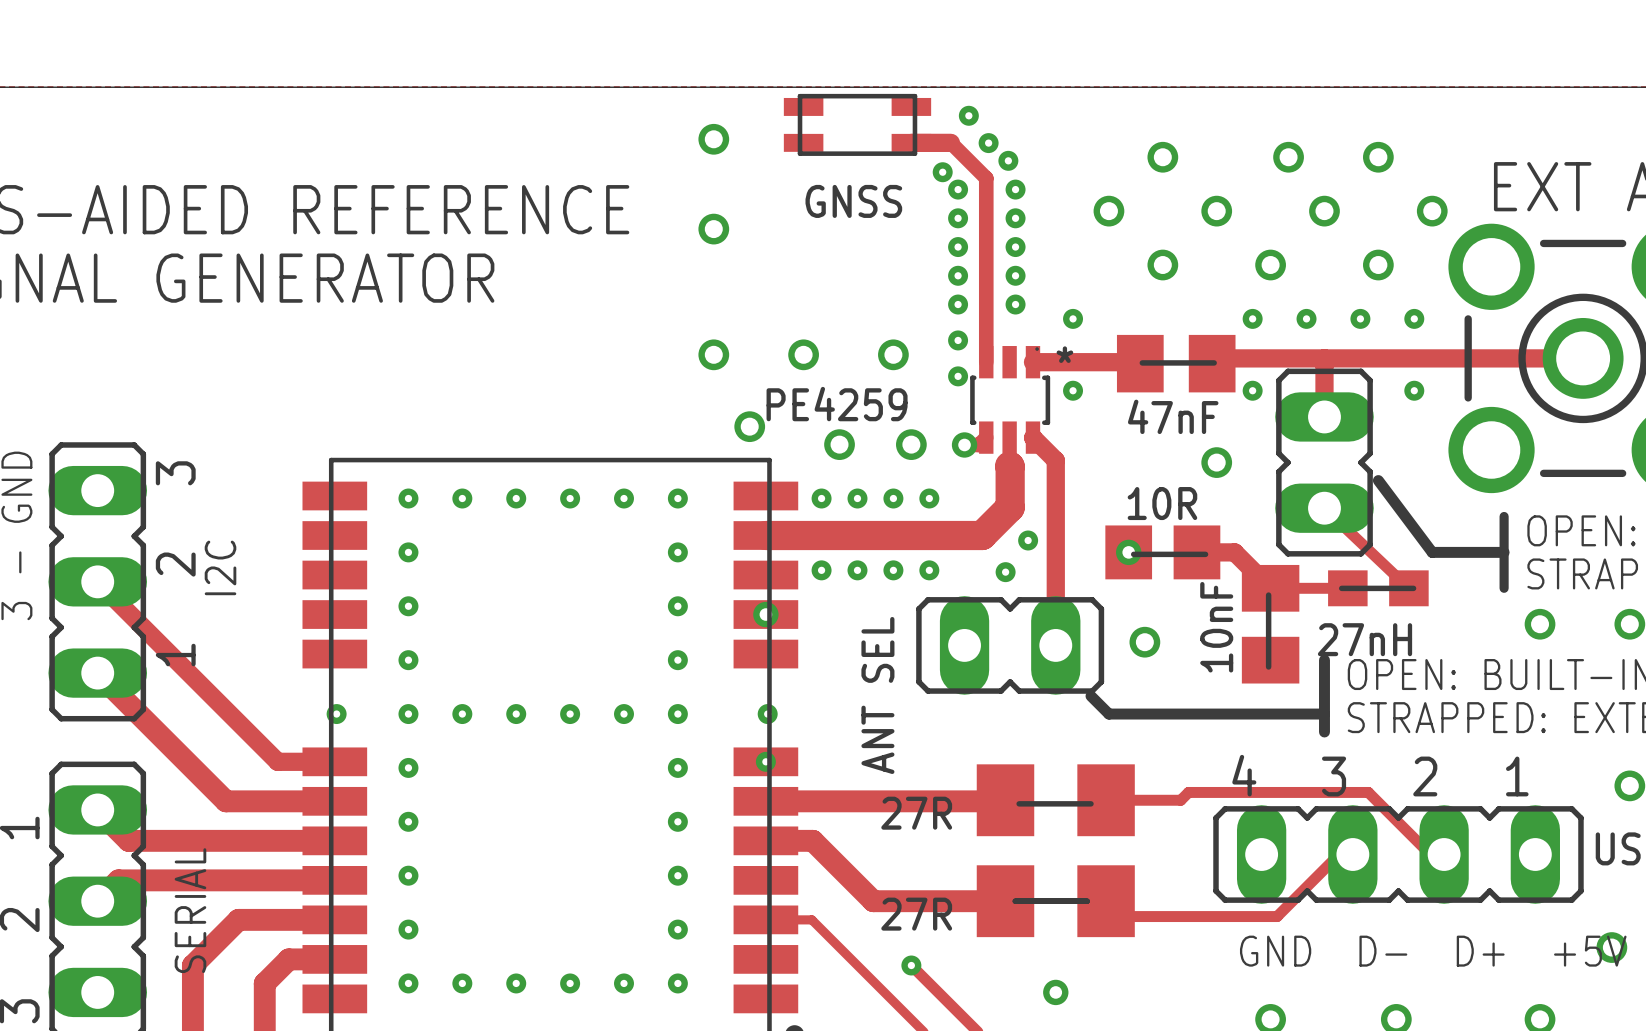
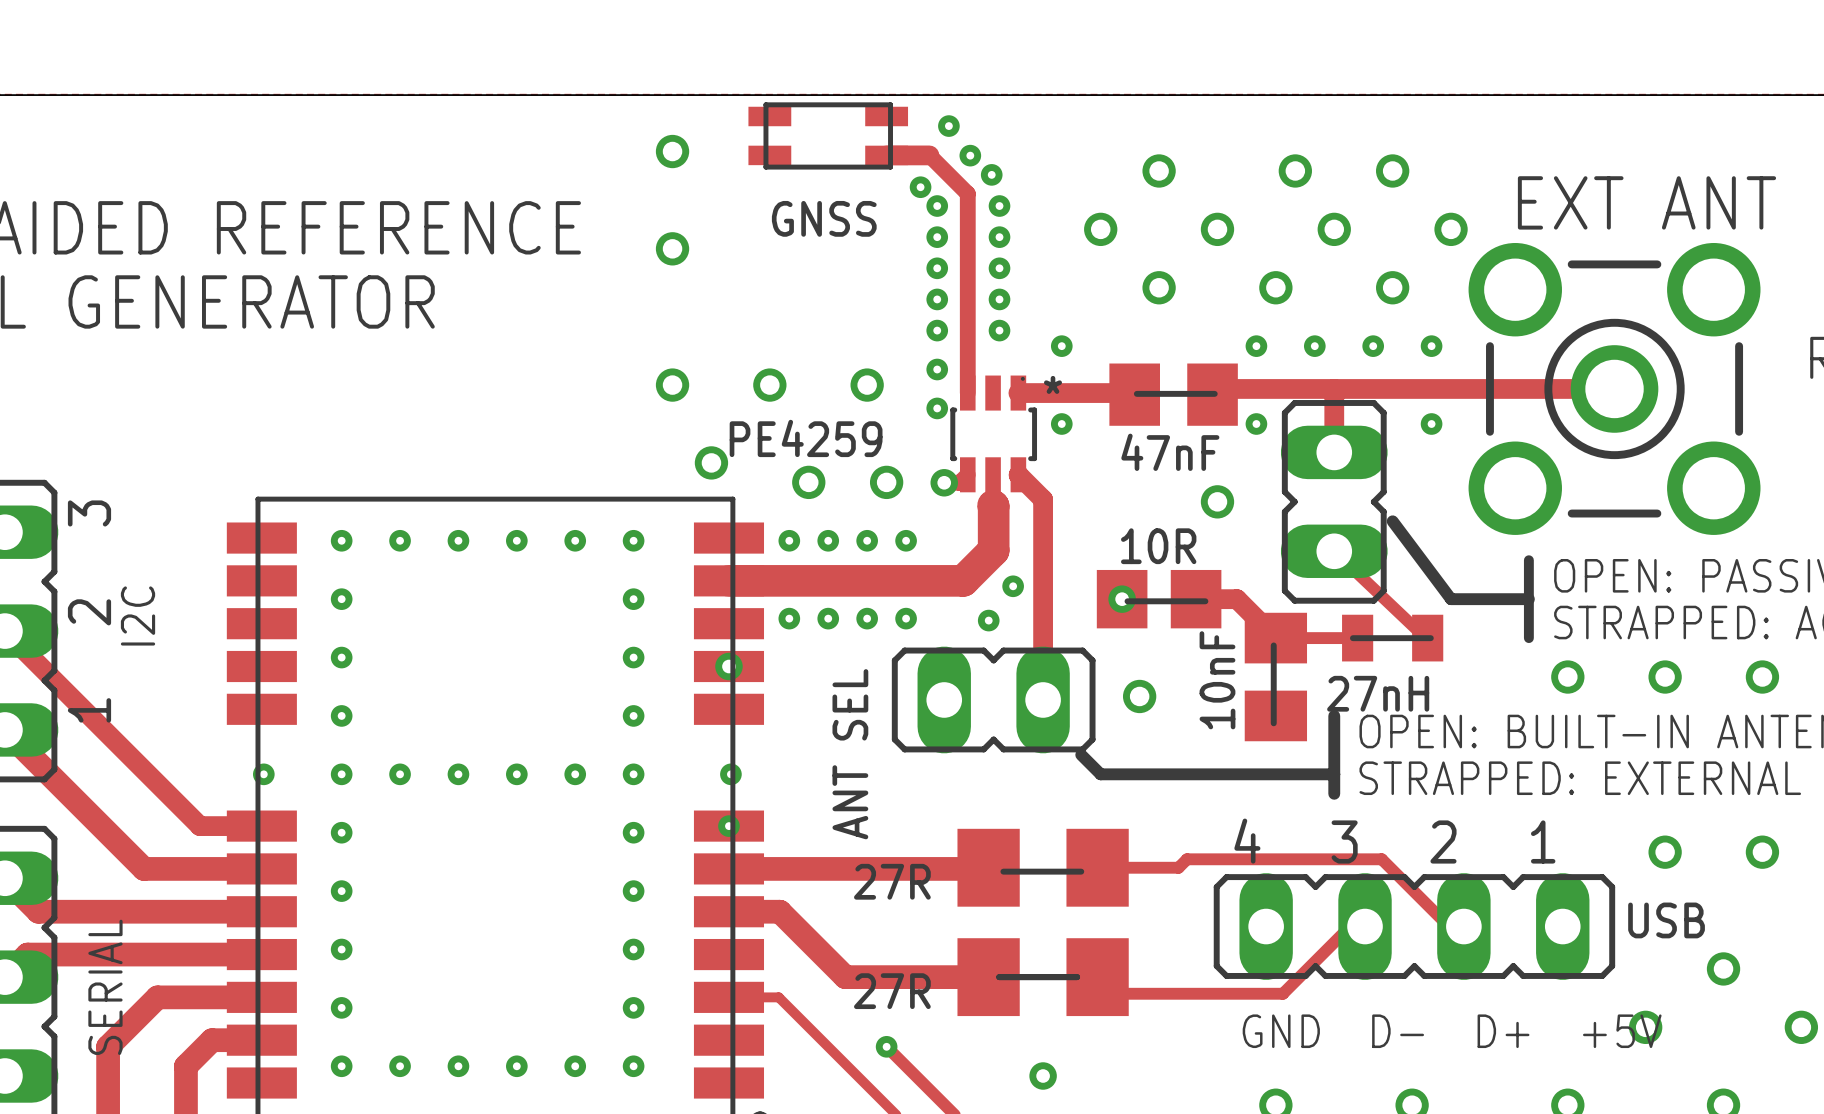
part footprint: [1328, 570, 1429, 607] -> [1342, 614, 1444, 662]

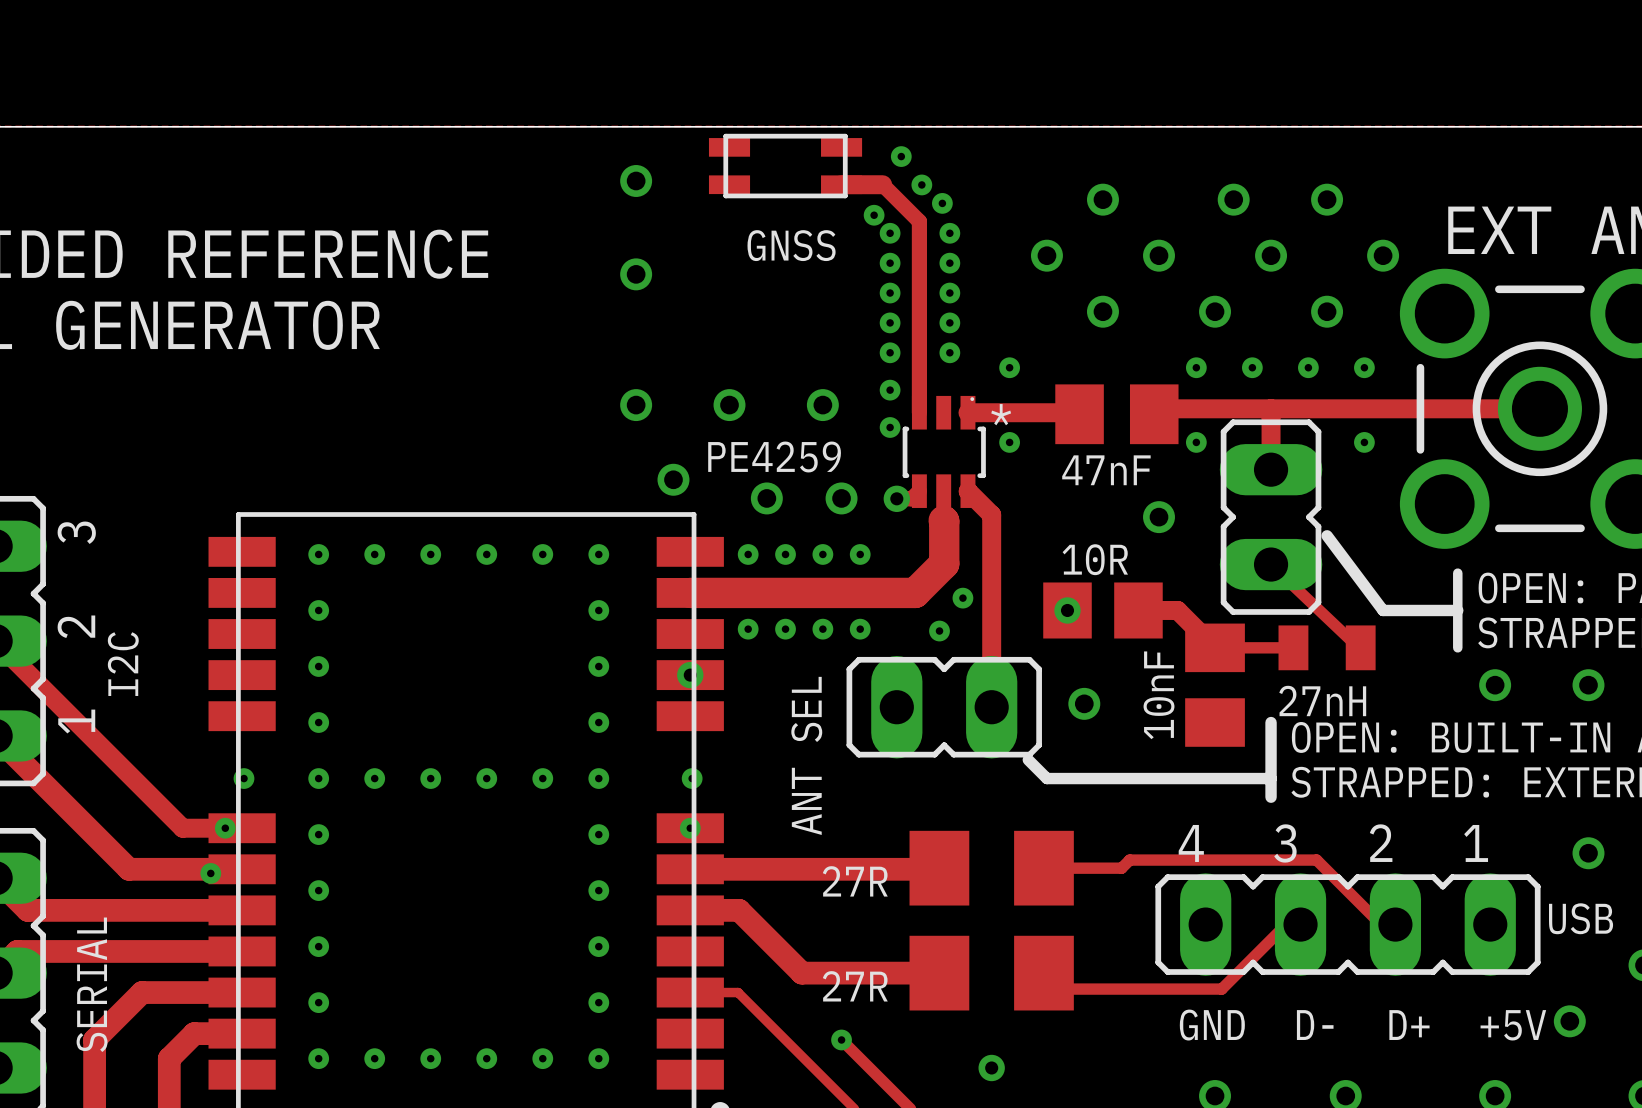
line: (1136, 393) (1214, 393) -> none
line: (1127, 601) (1205, 601) -> none
part value position: I2C (138, 615) -> I2C (123, 664)
line: (1352, 638) (1430, 638) -> none
line: (1273, 645) (1273, 723) -> none
via: none -> (225, 828)
line: (1003, 871) (1081, 871) -> none
via: none -> (210, 873)
line: (999, 977) (1077, 977) -> none

